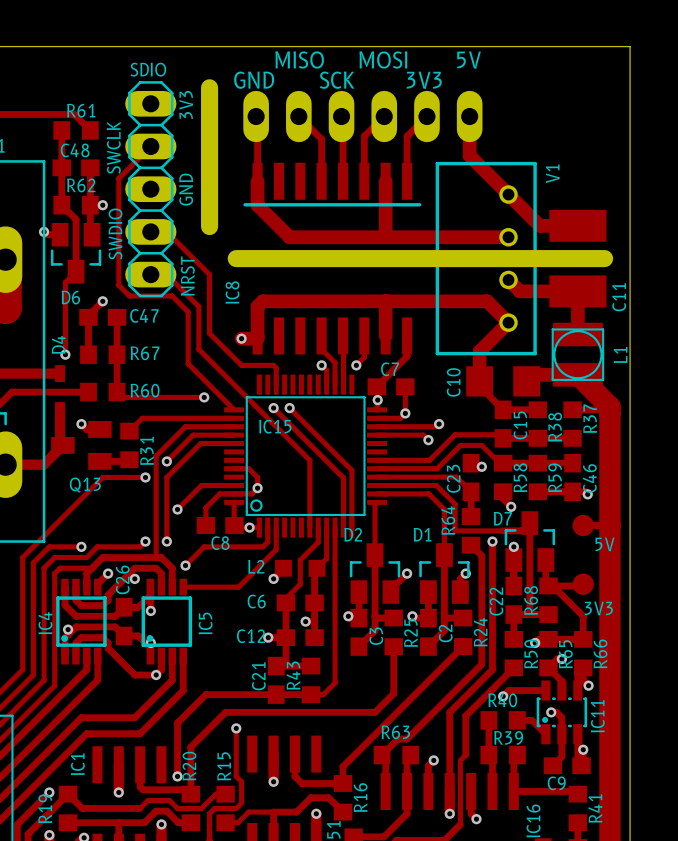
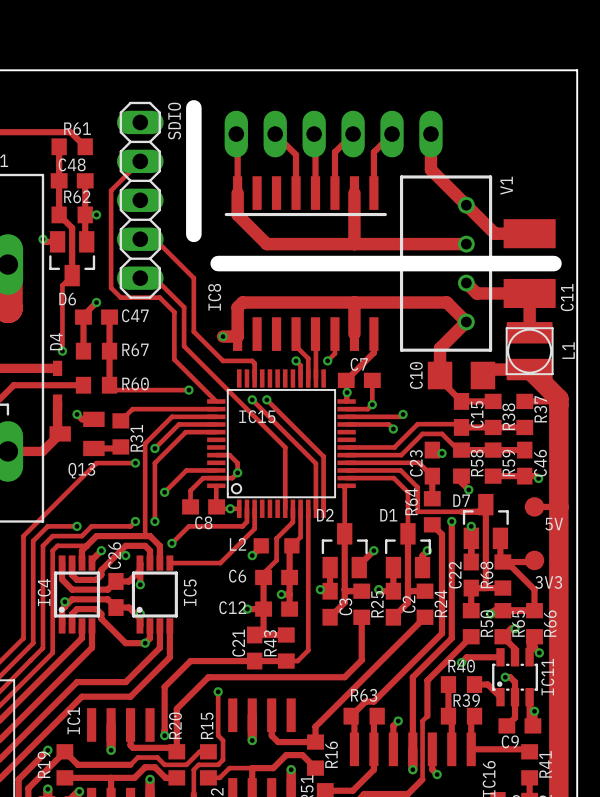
text: MISO (299, 59) -> none
text: MOSI (383, 59) -> none
text: 5V (469, 60) -> none
SDIO name rotation: 0° (148, 69) -> 90° counterclockwise (174, 121)
text: GND (254, 80) -> none
text: SCK (337, 80) -> none
text: 3V3 (424, 80) -> none
text: 3V3 (186, 104) -> none
text: SWCLK (113, 147) -> none
text: GND (186, 189) -> none
text: SWDIO (115, 233) -> none
text: NRST (187, 276) -> none

